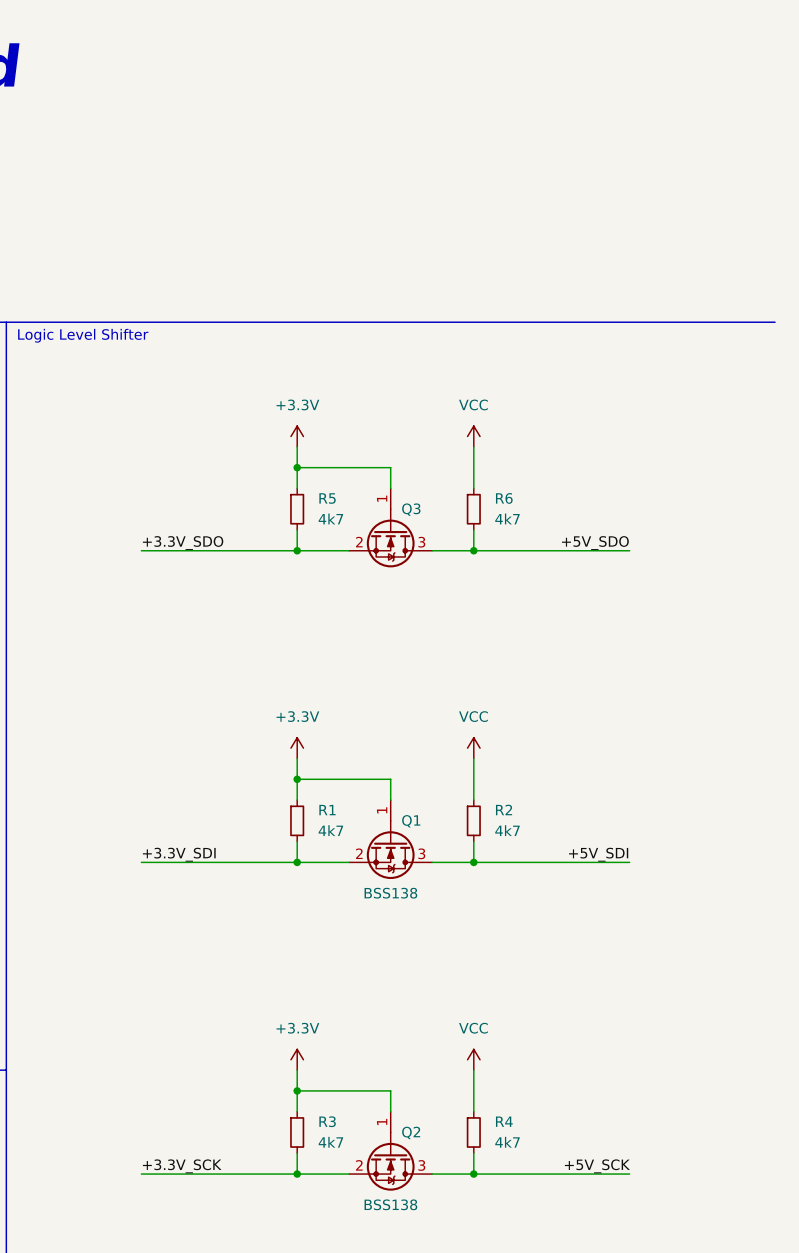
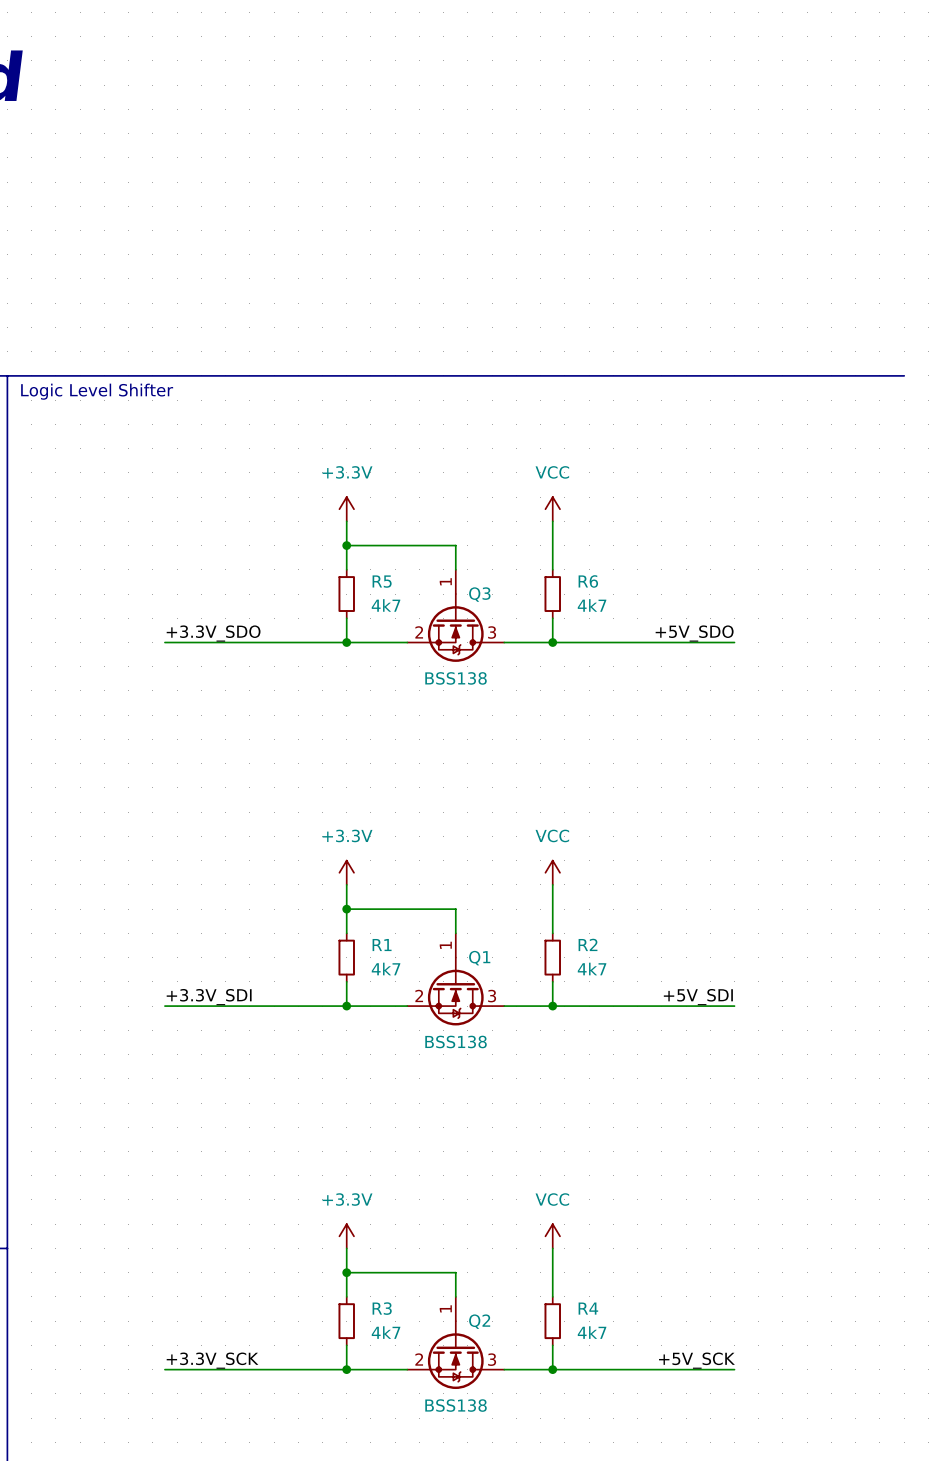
Q3 value: none -> BSS138 (456, 678)

